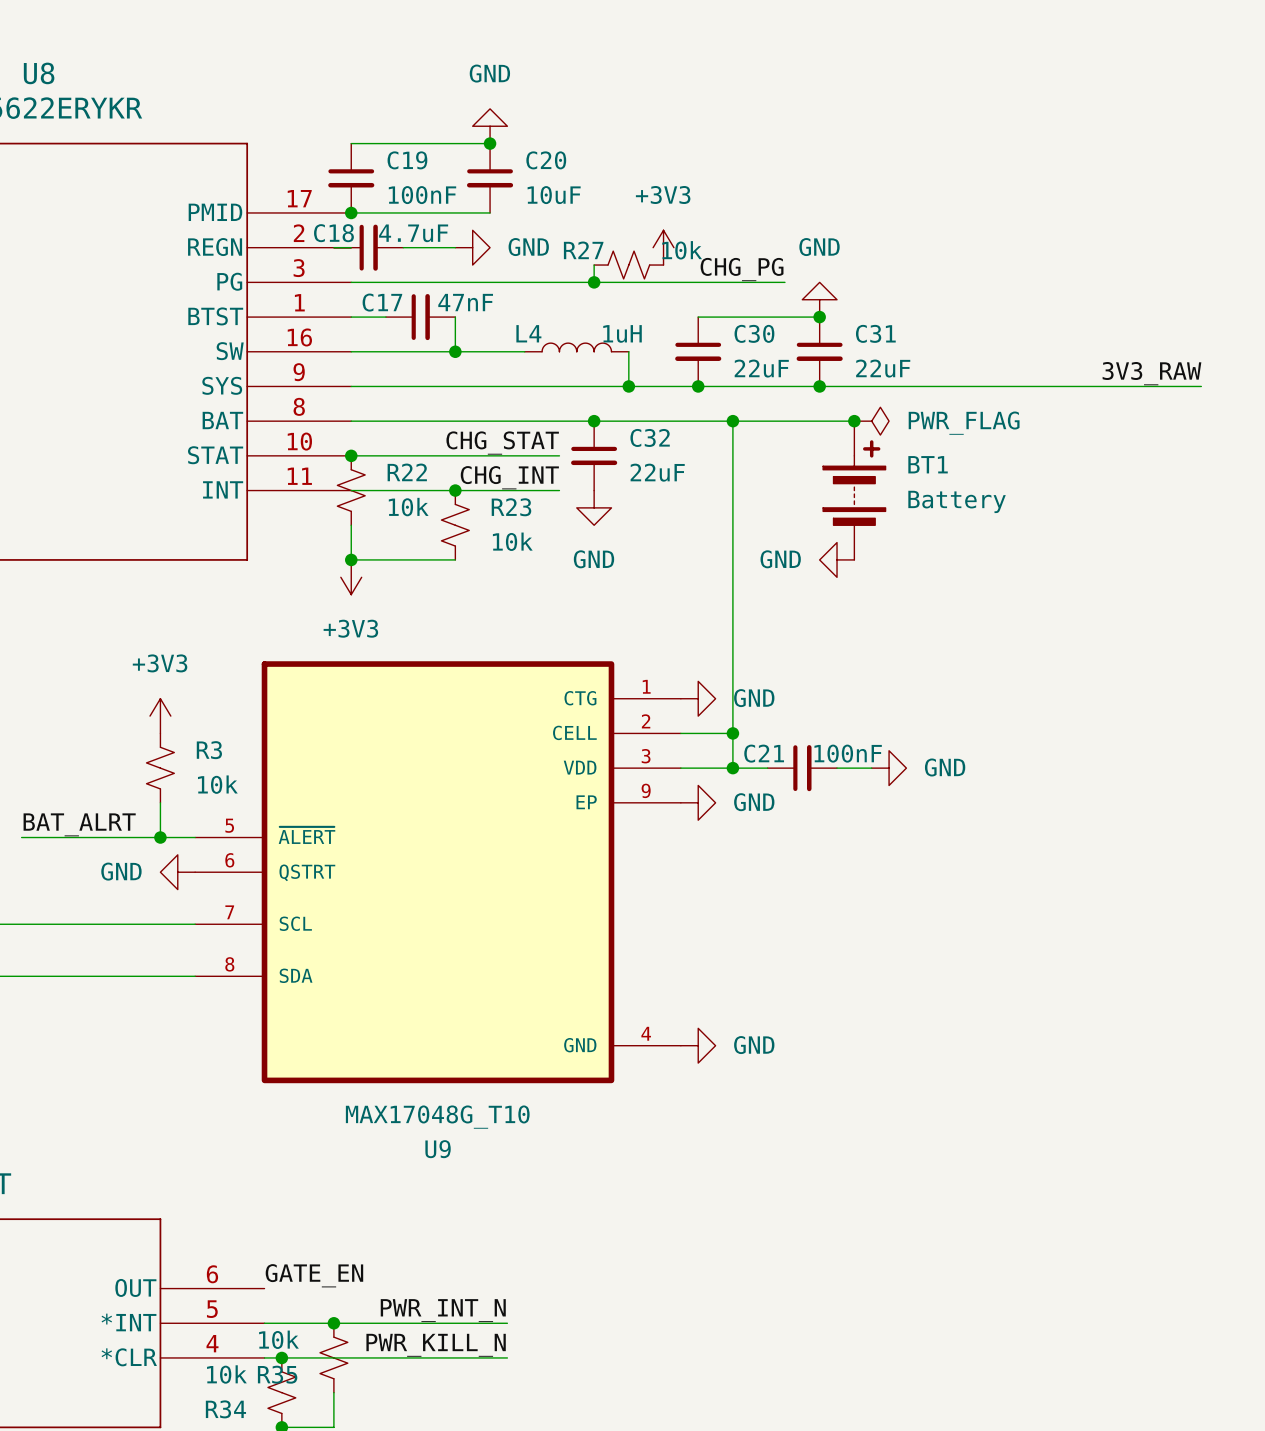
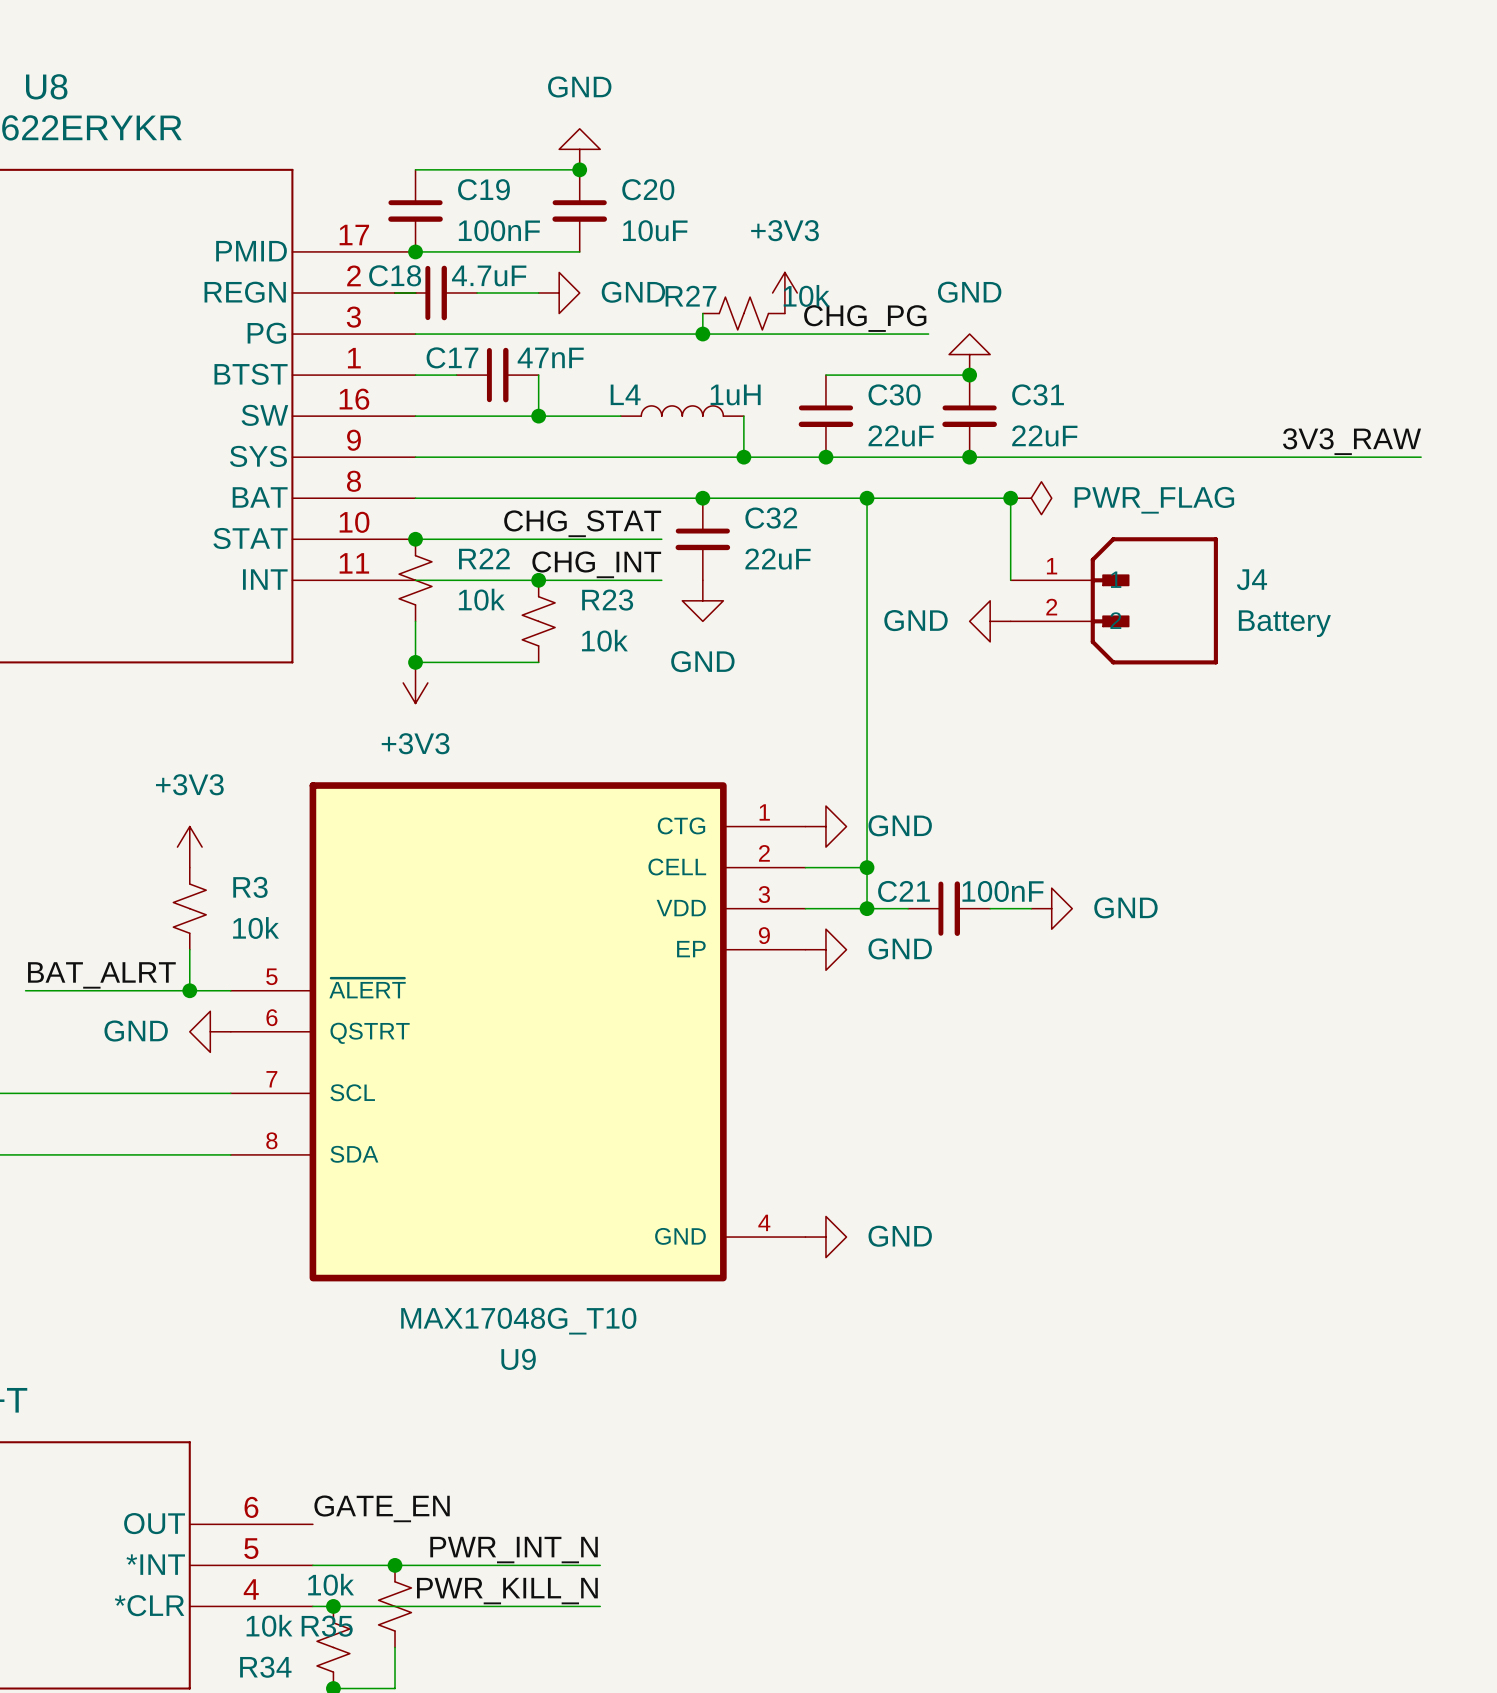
BT1: Battery (854, 490) -> none
J4: none -> Battery (1114, 600)
power symbol position: GND (837, 559) -> GND (990, 621)

